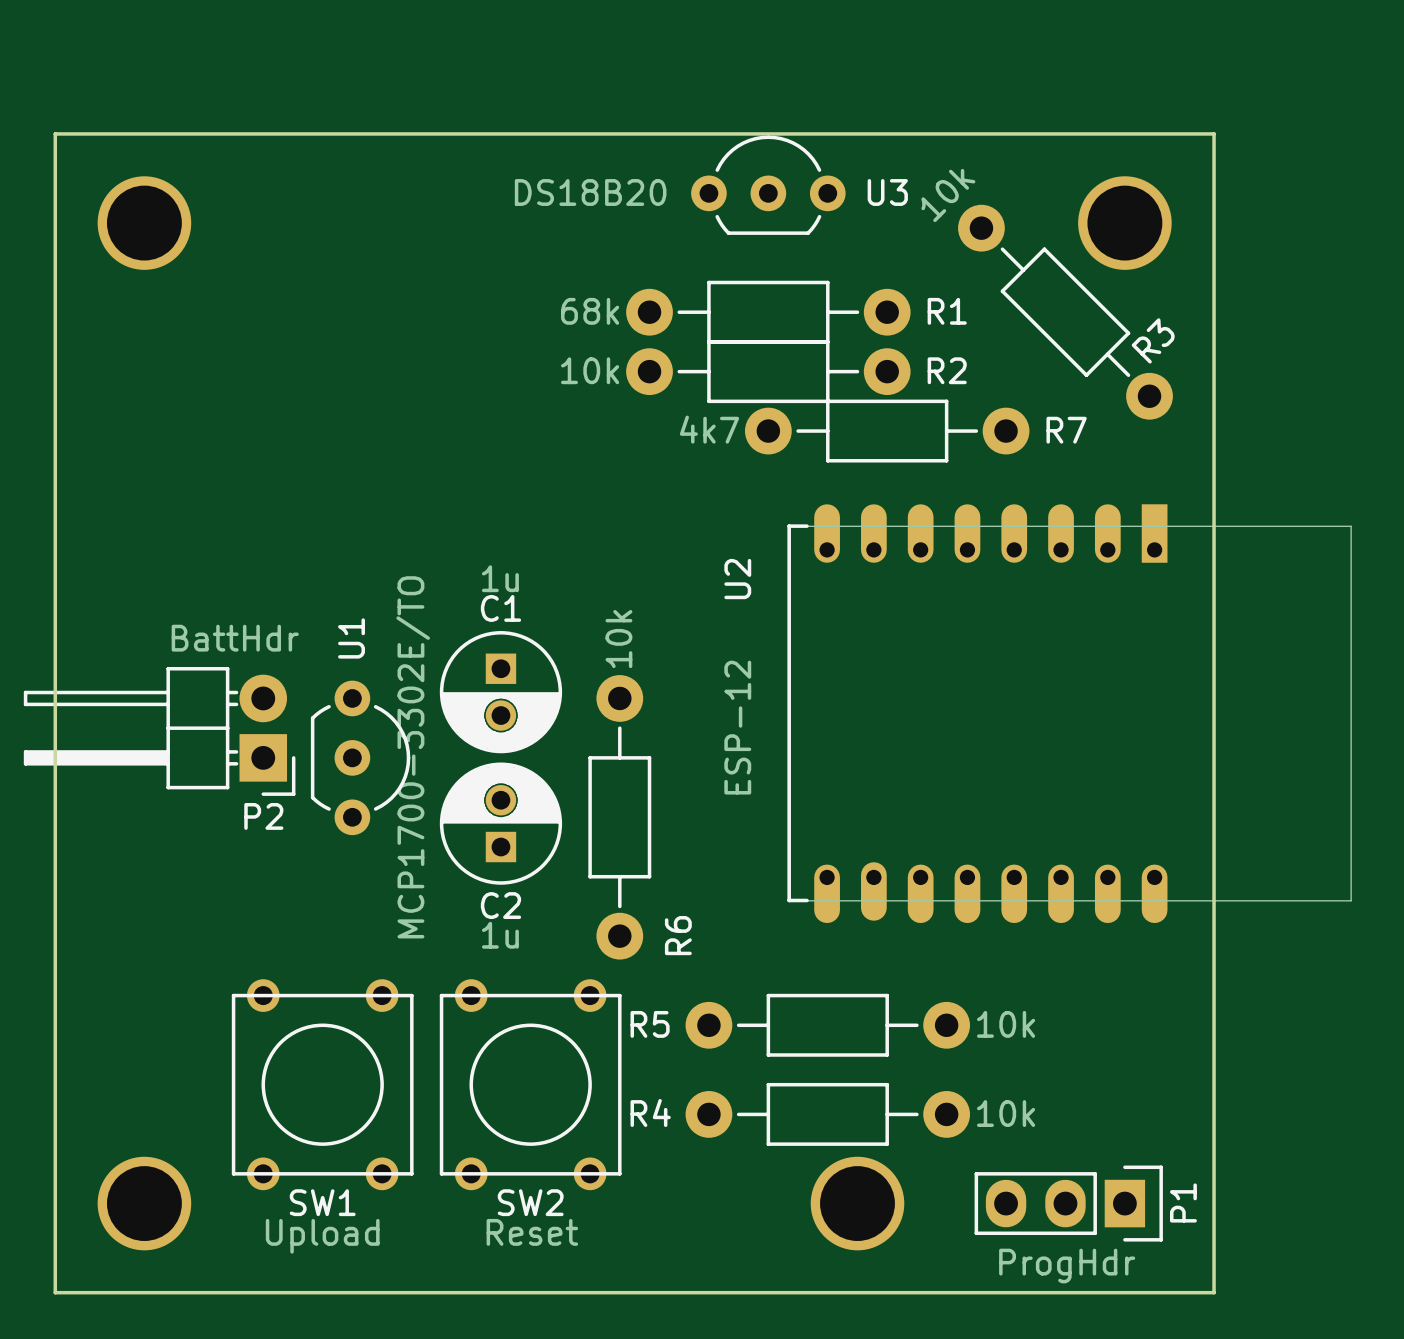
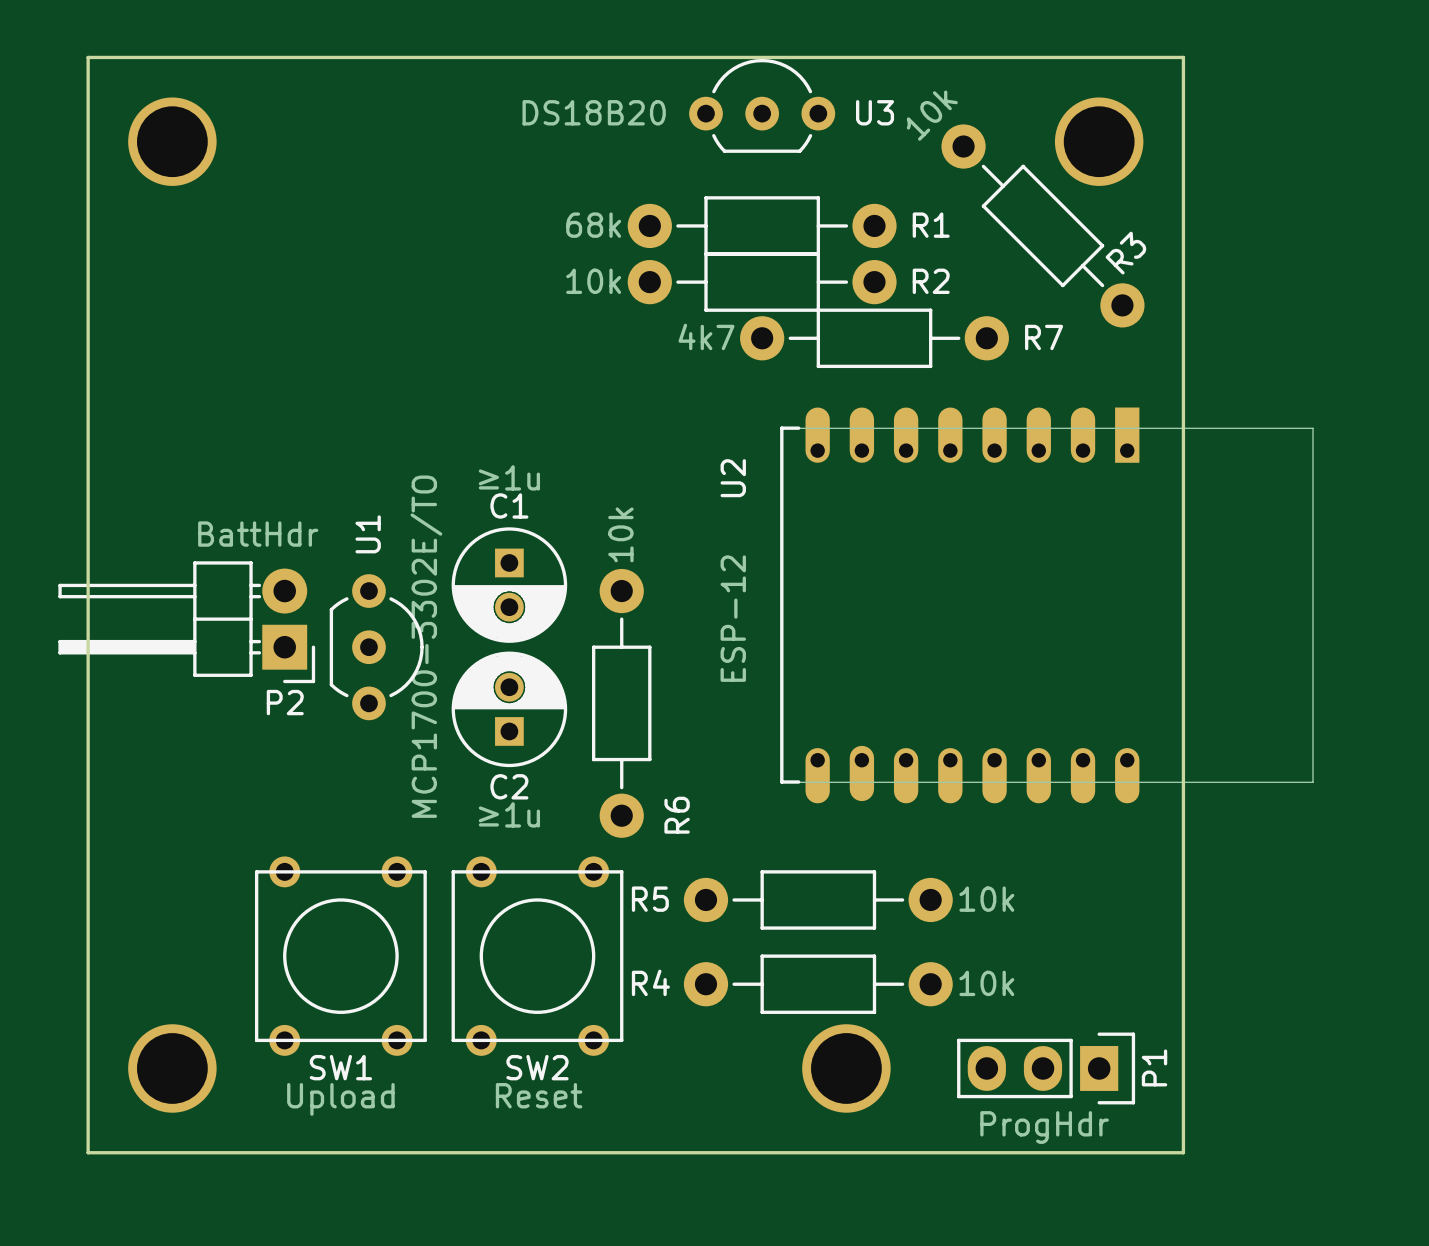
C1 value: 1u (500, 578) -> ≥1u (509, 477)
C2 value: 1u (500, 935) -> ≥1u (509, 814)

